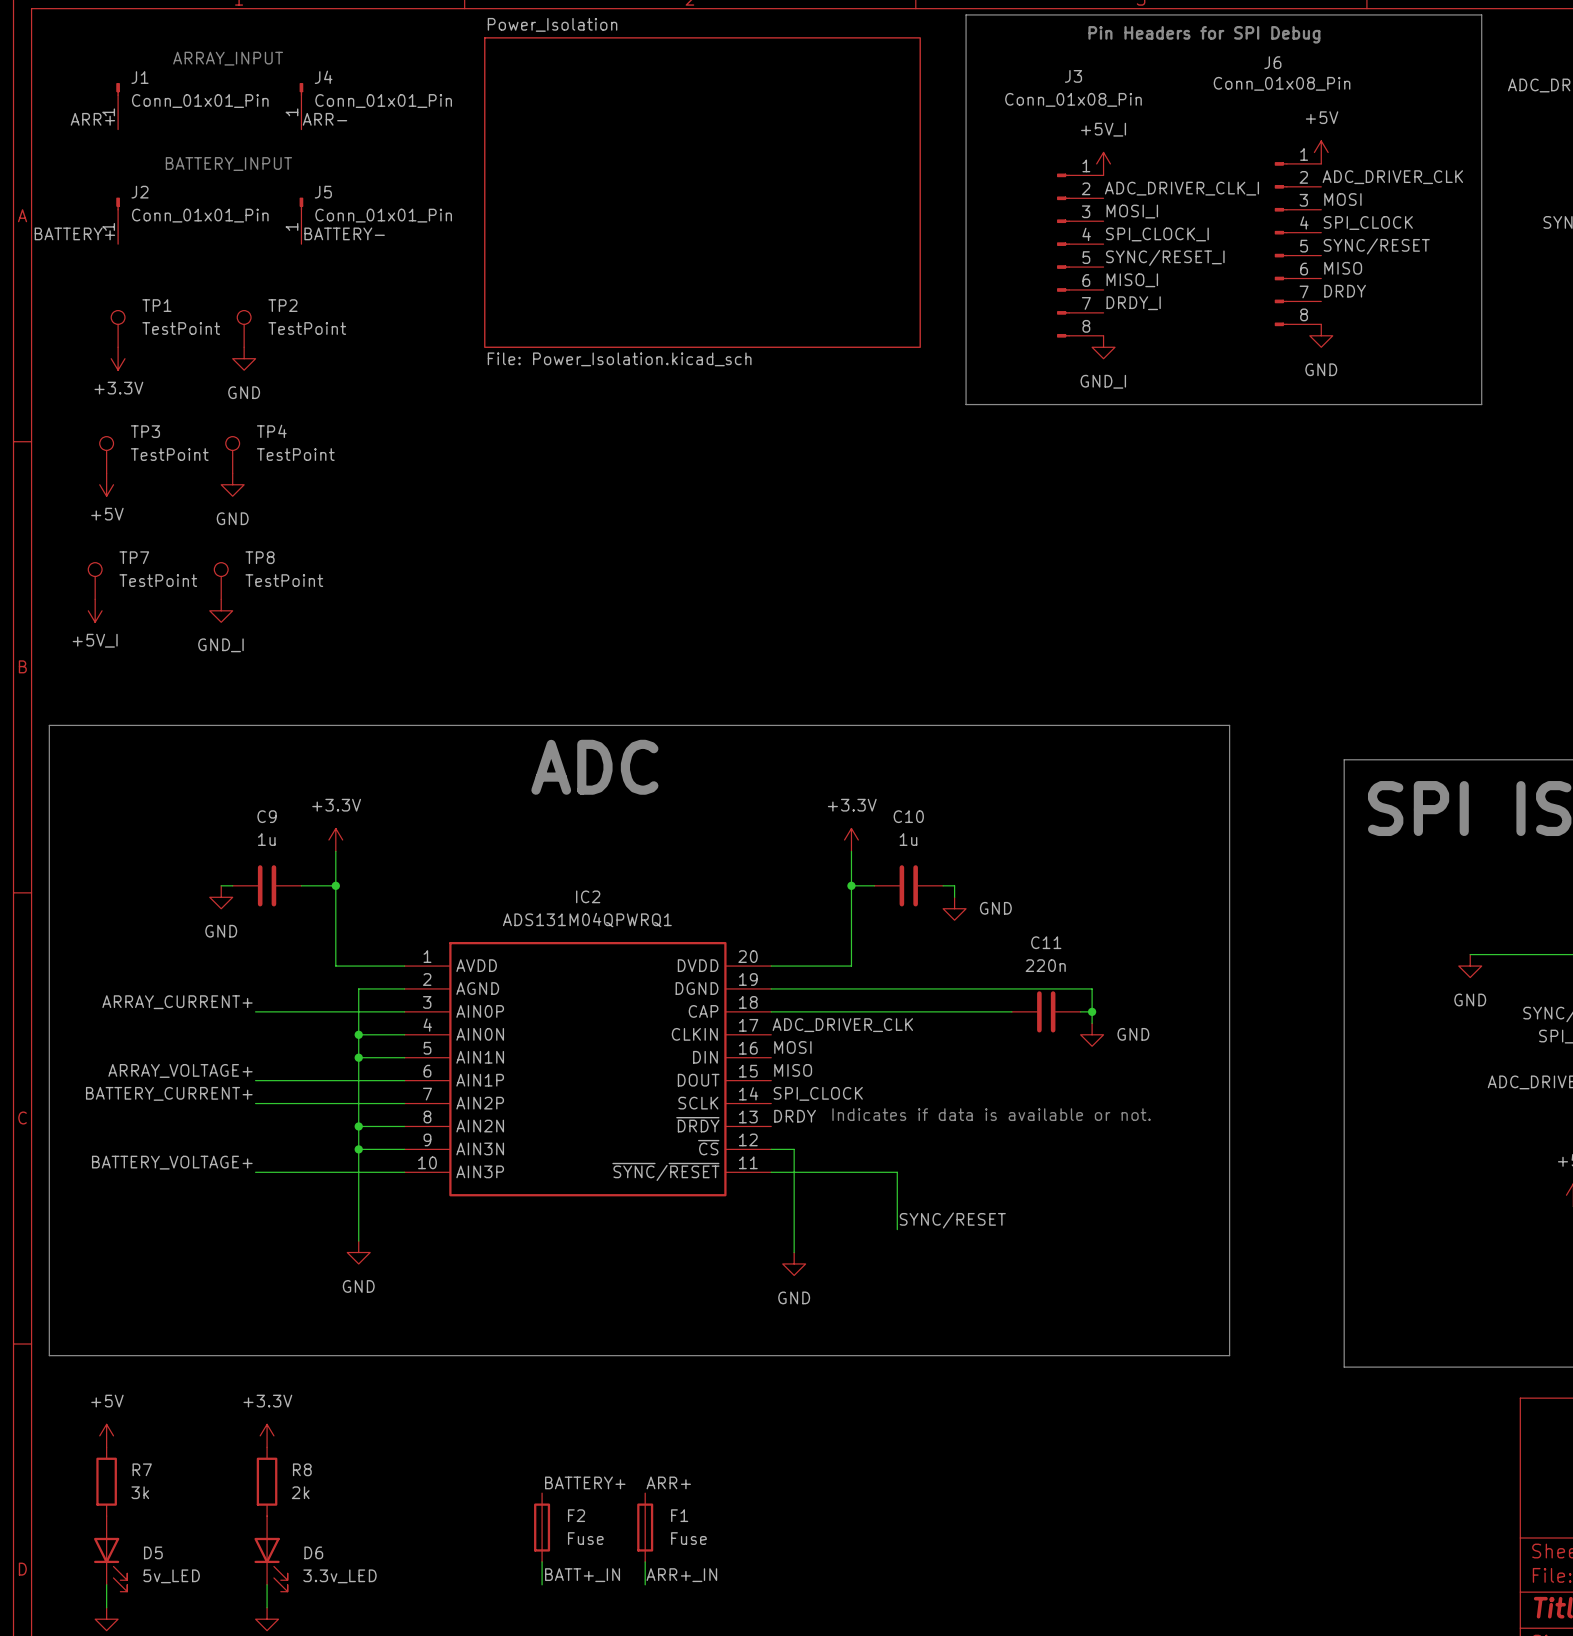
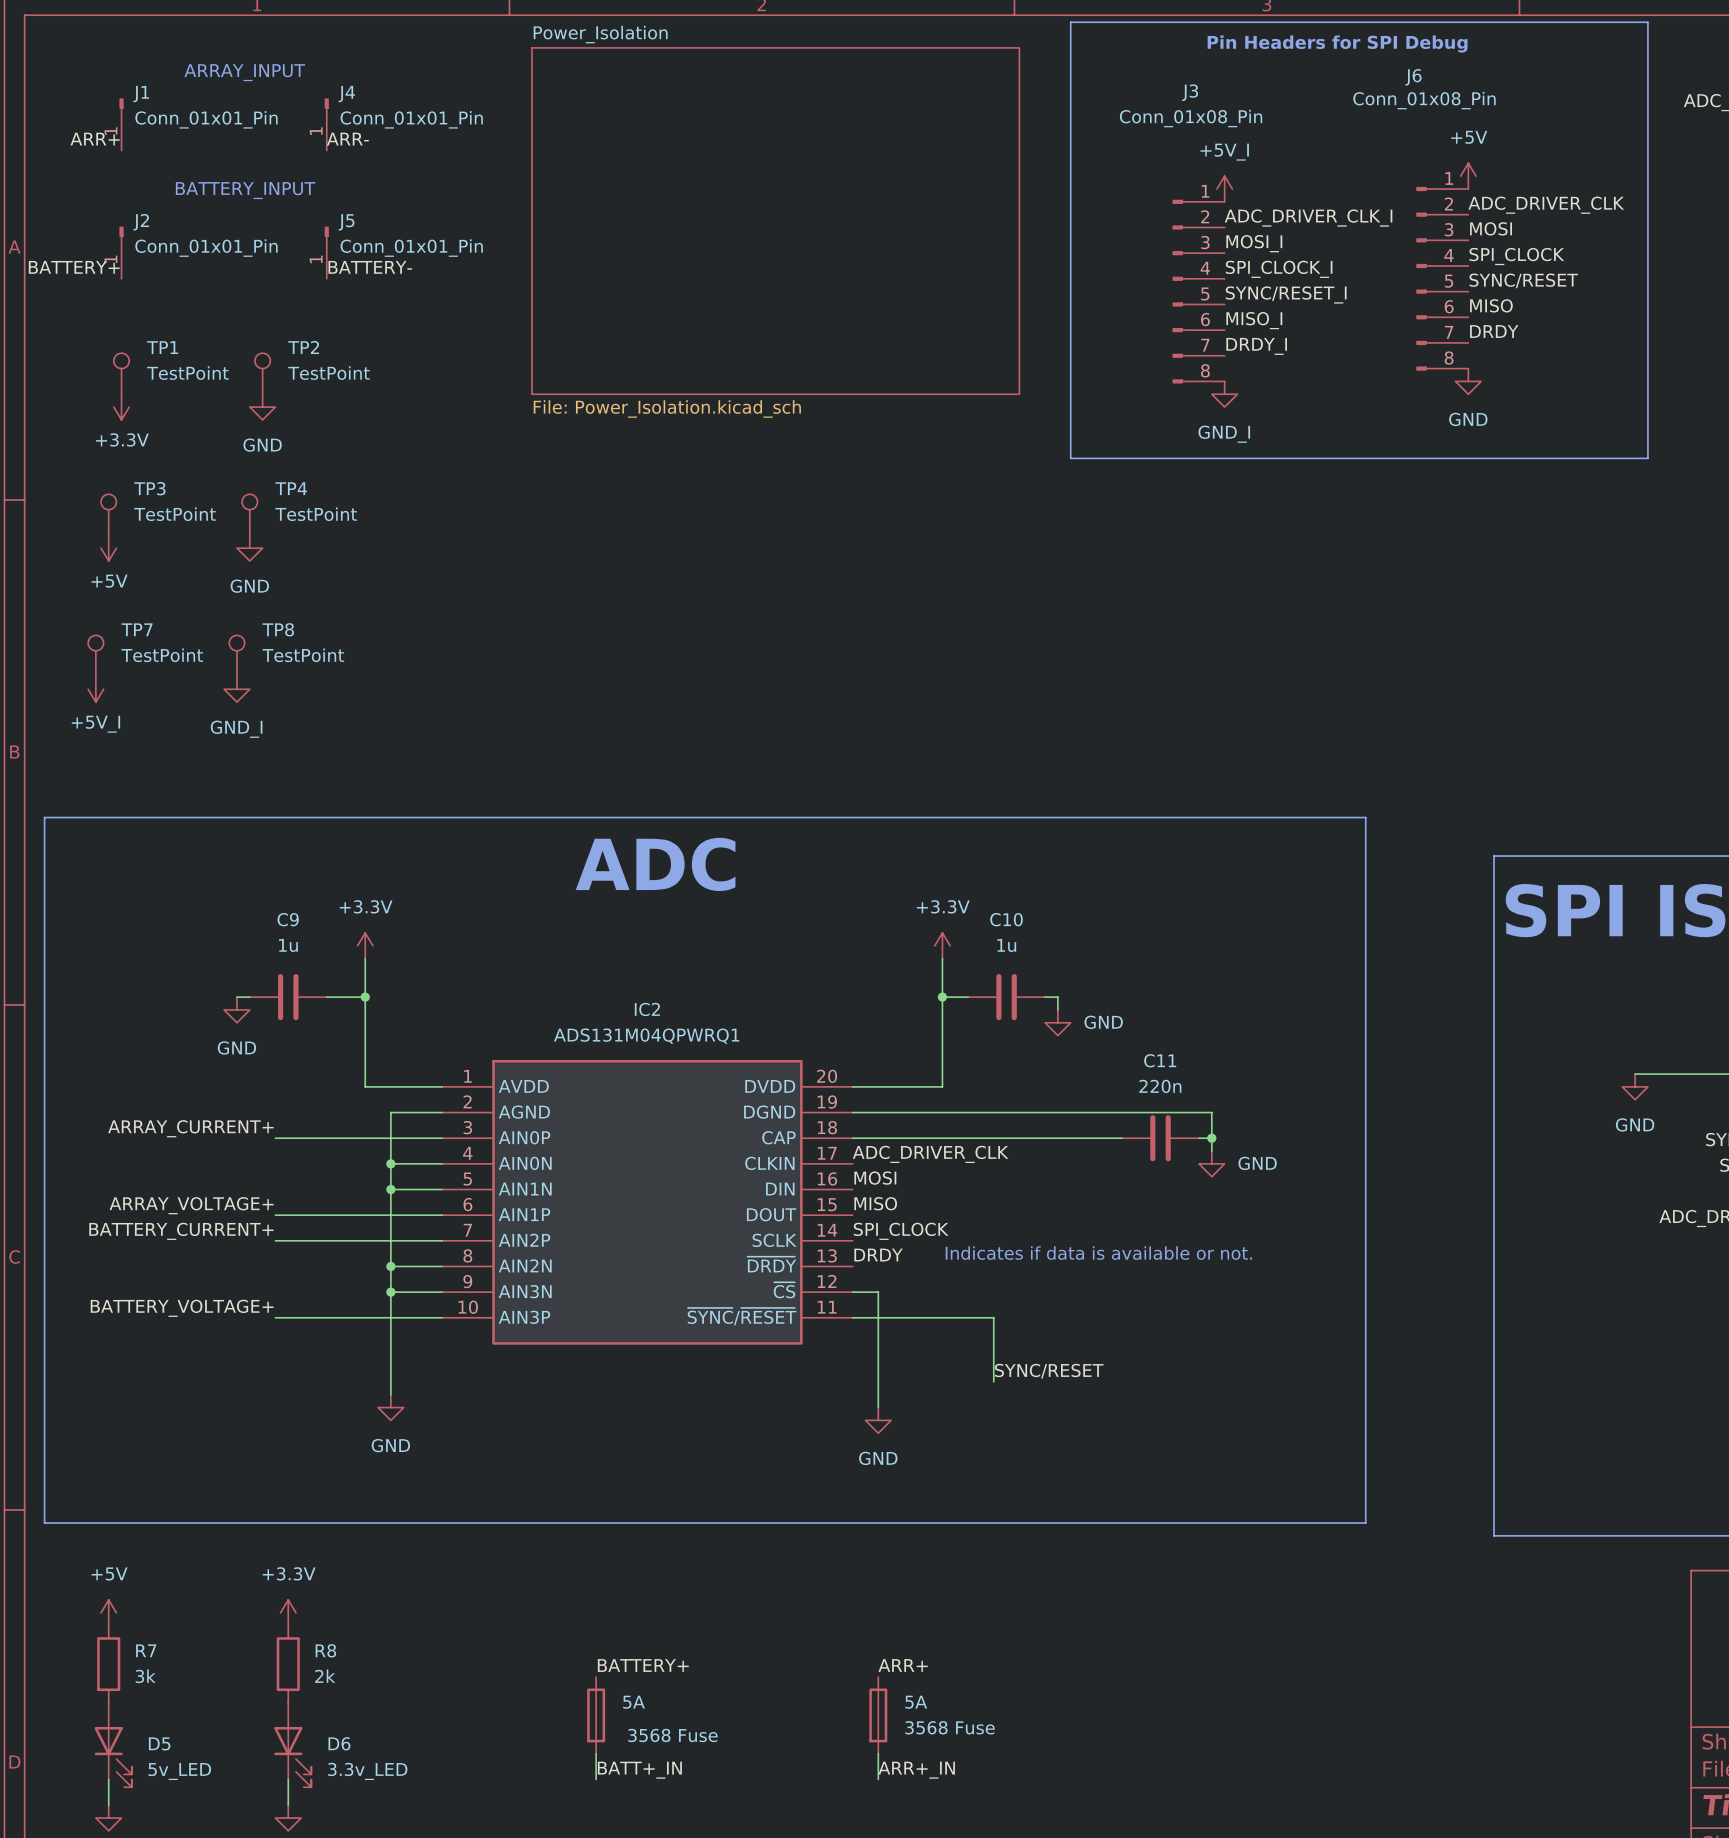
label position: ARR+ (668, 1482) -> ARR+ (903, 1665)
F2 name: F2 (576, 1515) -> 5A (634, 1702)
F1: Fuse (645, 1527) -> none
5A: none -> 3568 Fuse (878, 1715)
F2 value: Fuse (585, 1538) -> 3568 Fuse (672, 1735)
wire: (645, 1561) (645, 1584) -> (878, 1753) (878, 1779)
label position: ARR+_IN (681, 1575) -> ARR+_IN (916, 1770)

